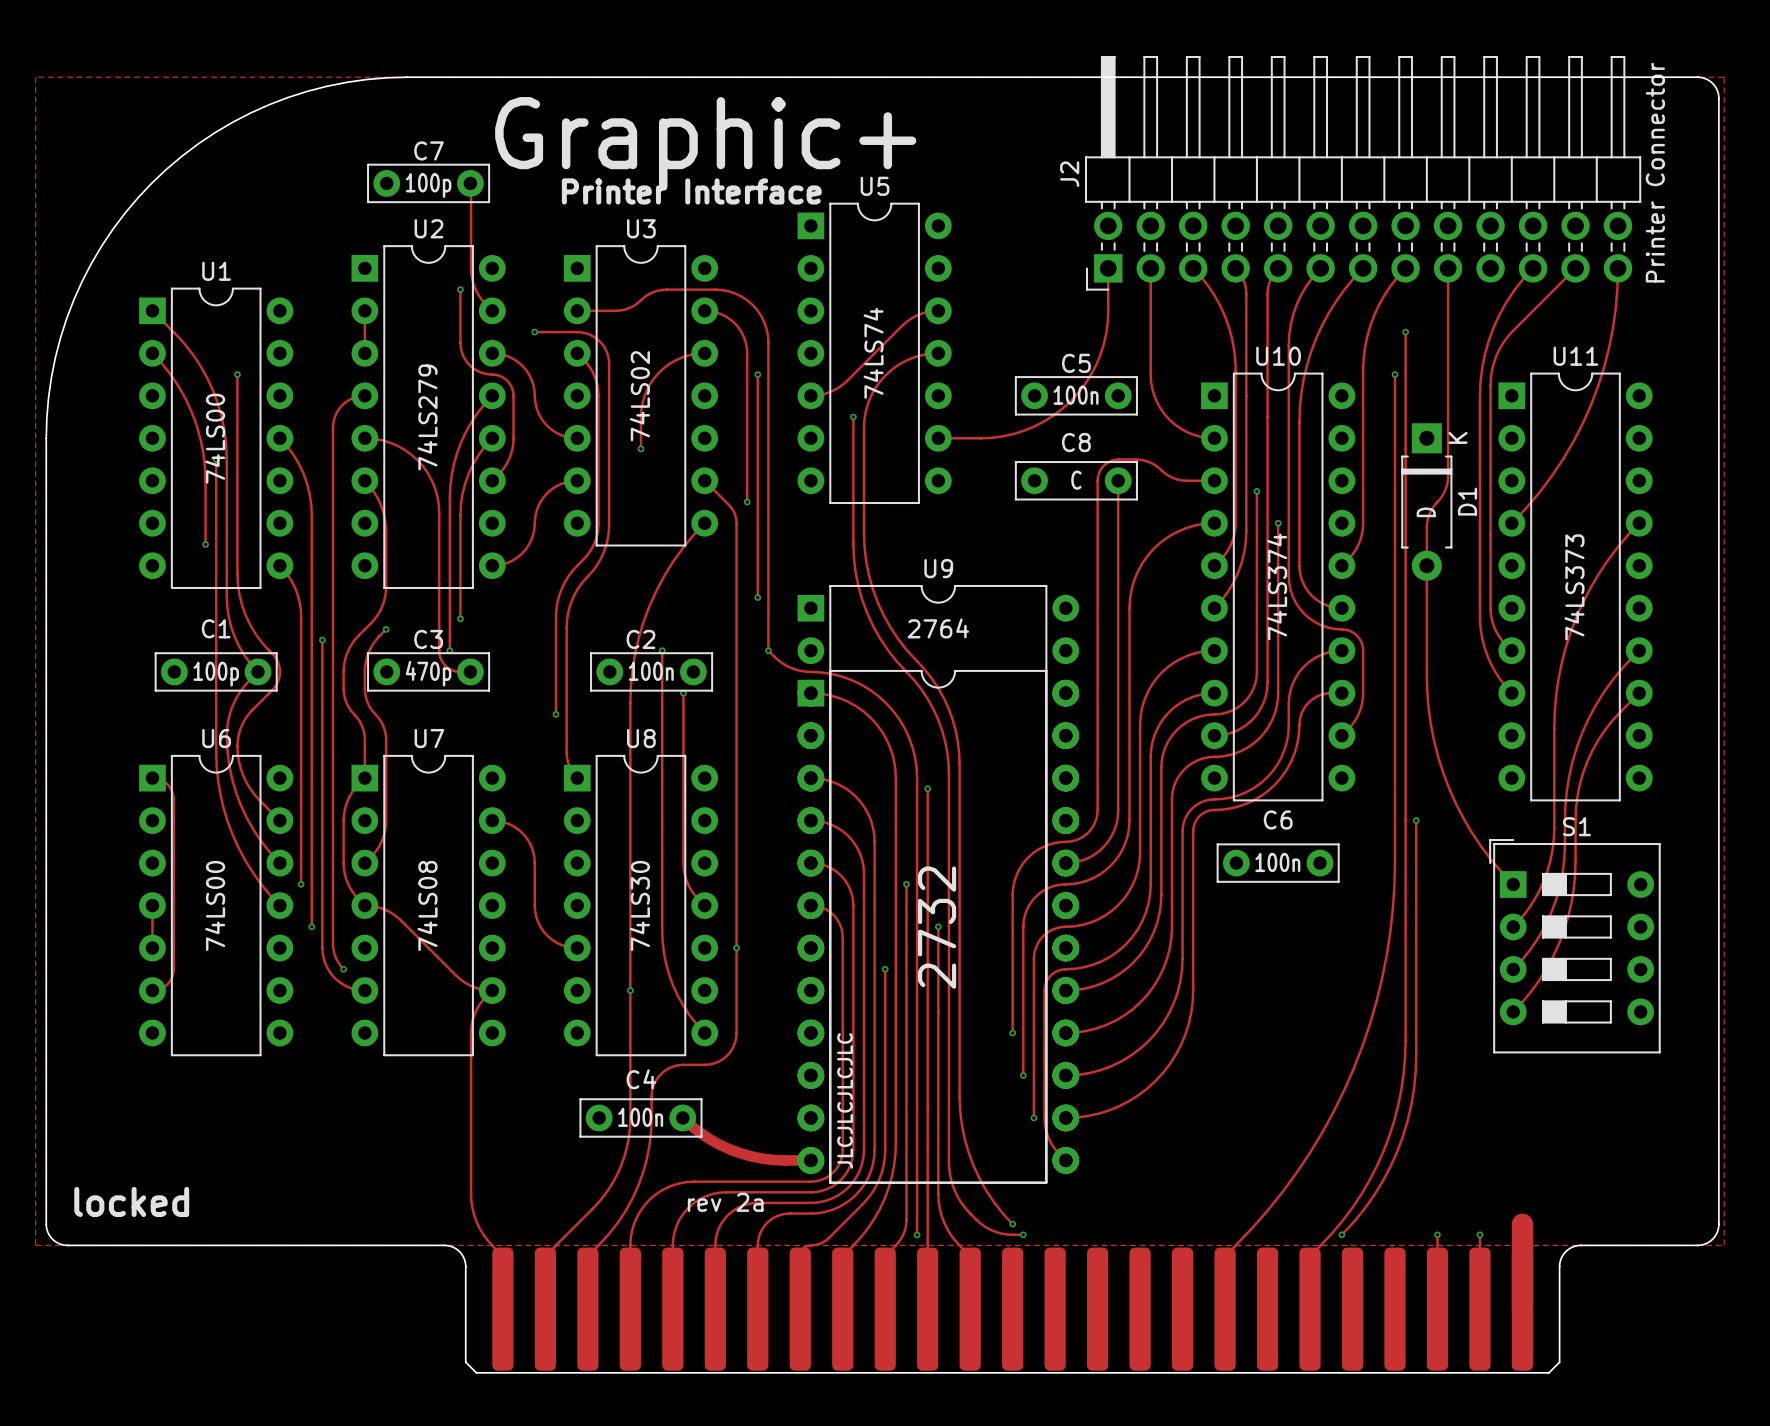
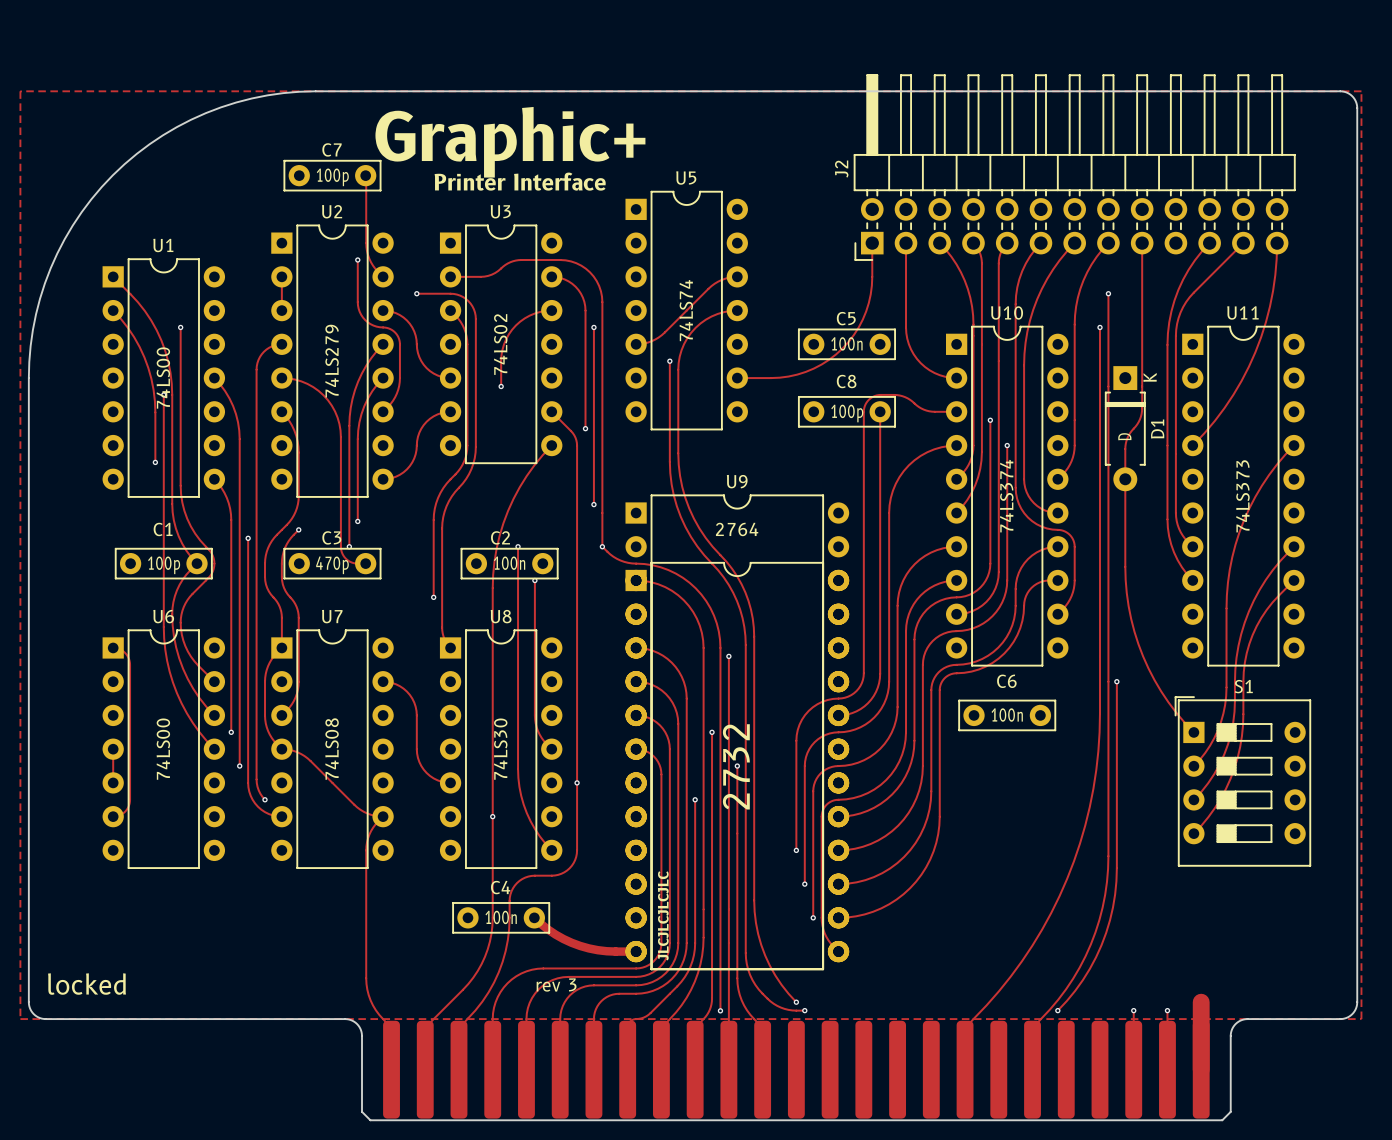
J2 value: Printer Connector (1655, 172) -> none
C8 value: C (1076, 480) -> 100p (847, 413)
text: rev 2a (725, 1202) -> rev 3 (556, 985)

